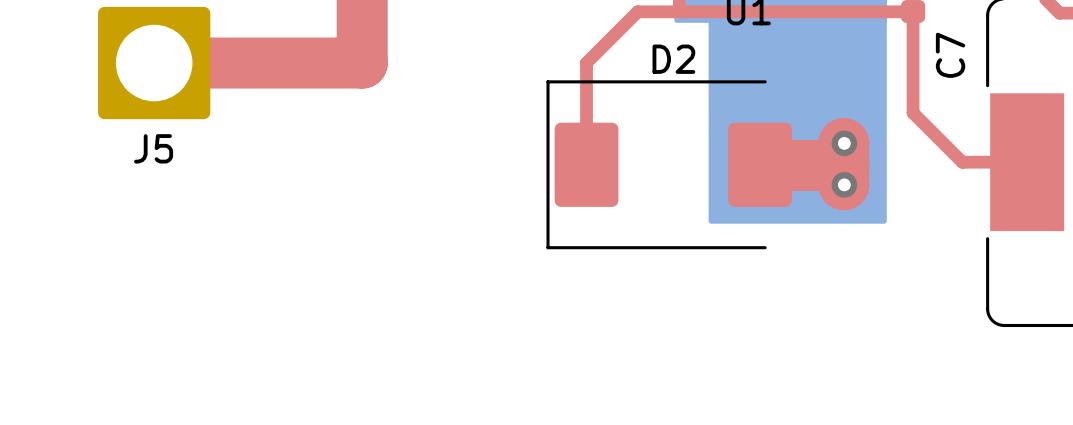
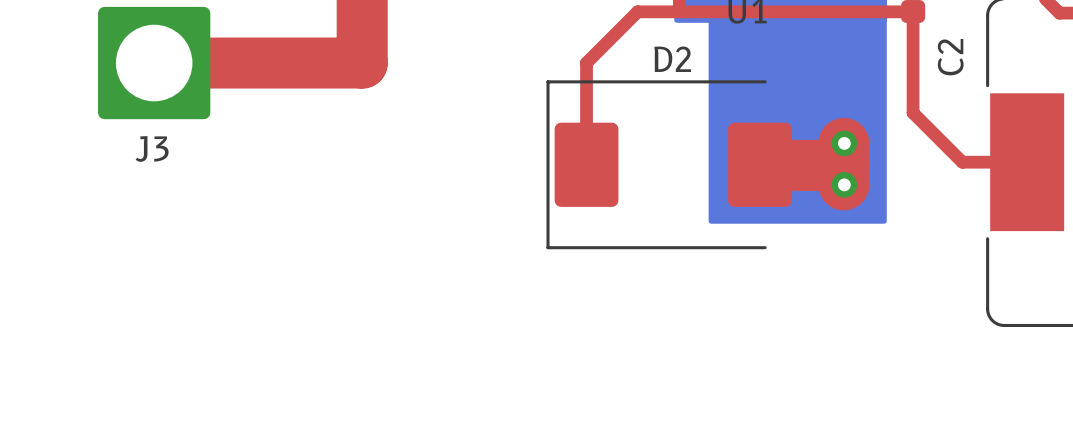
C7 name: C7 (950, 55) -> C2 (950, 57)
J5 name: J5 (153, 148) -> J3 (152, 148)

